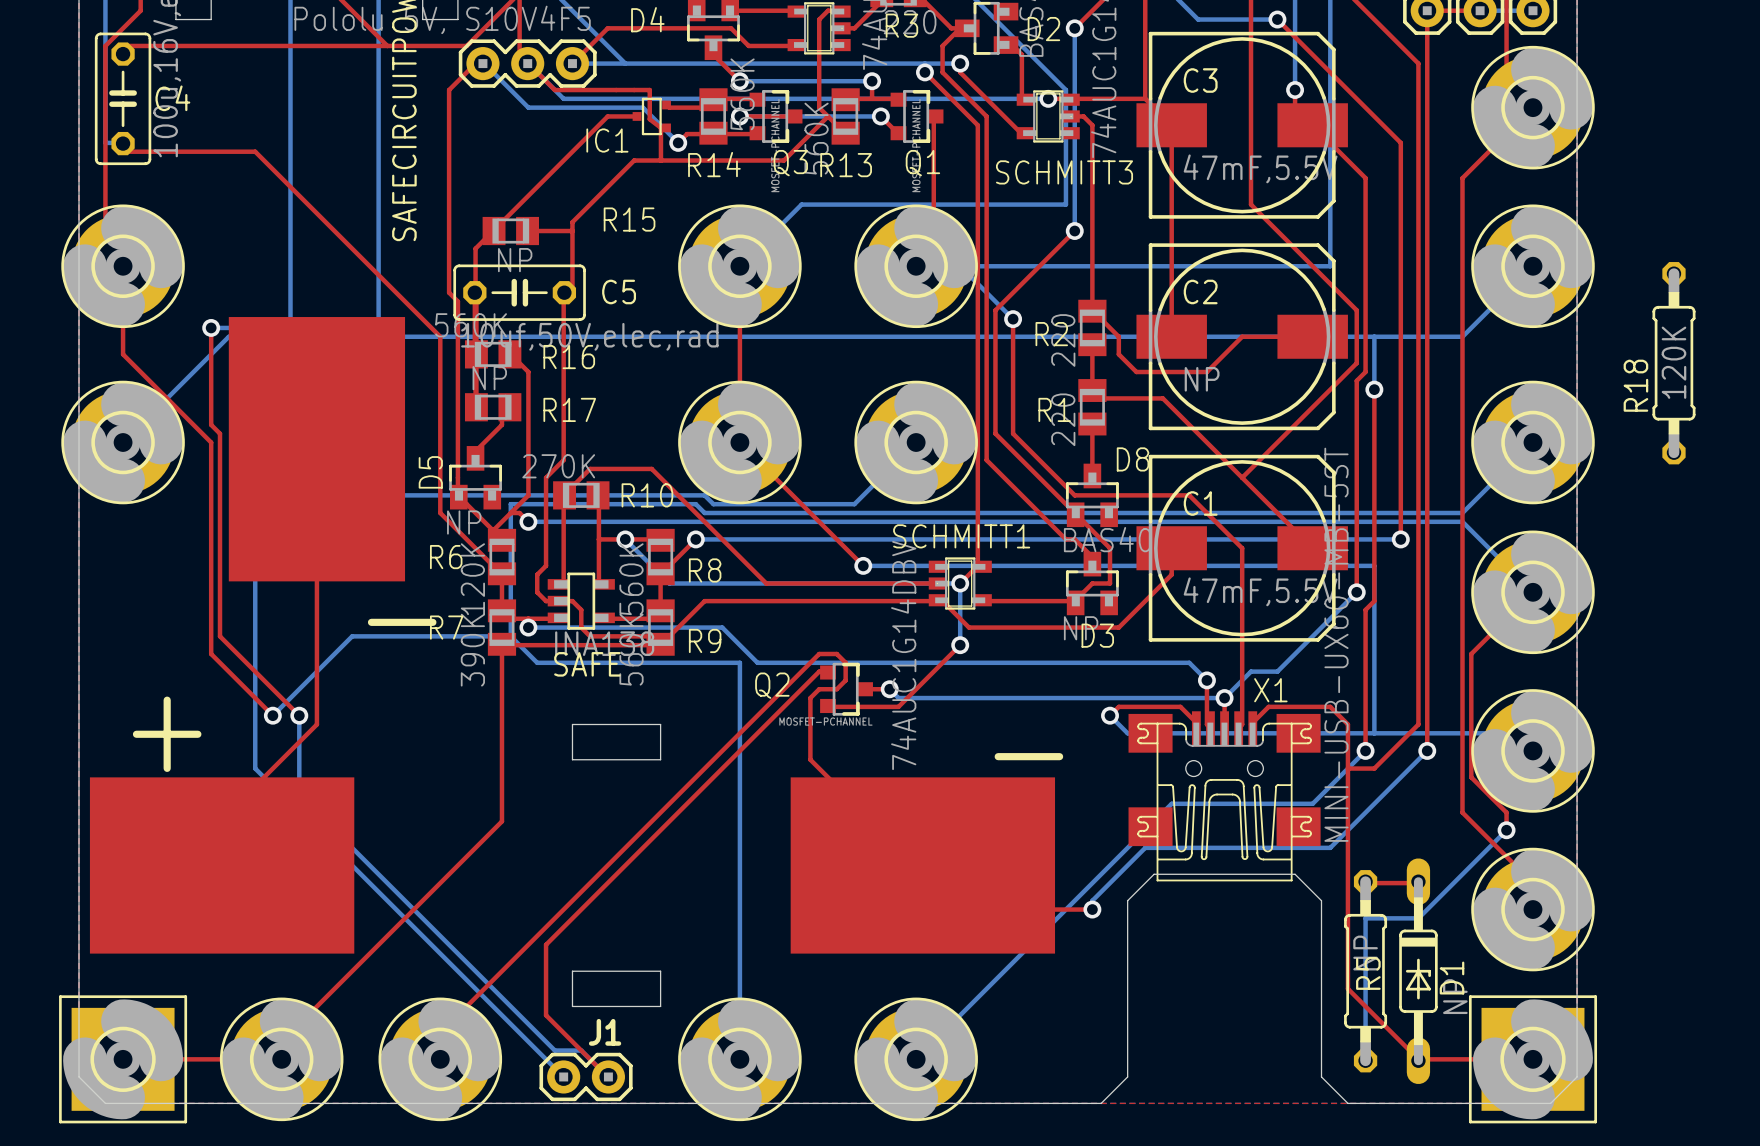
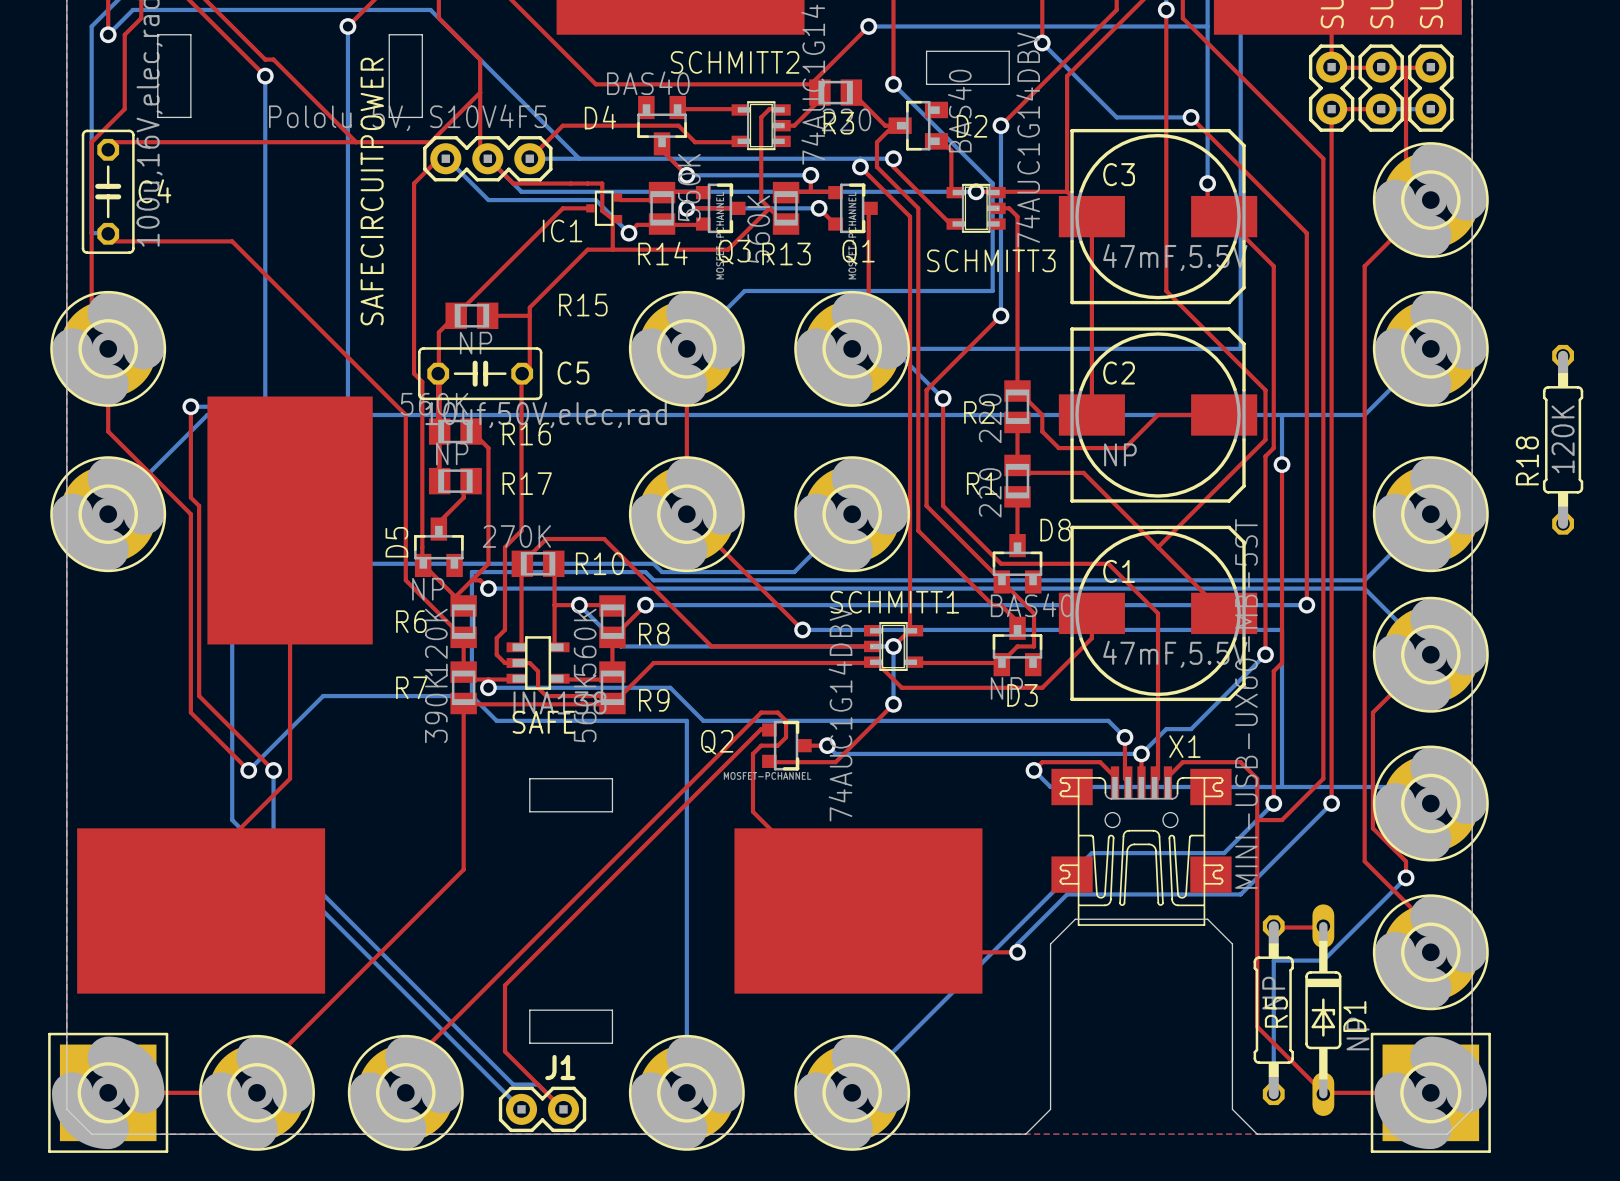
text: - (402, 622) -> none
text: + (167, 734) -> none
text: - (1028, 756) -> none

